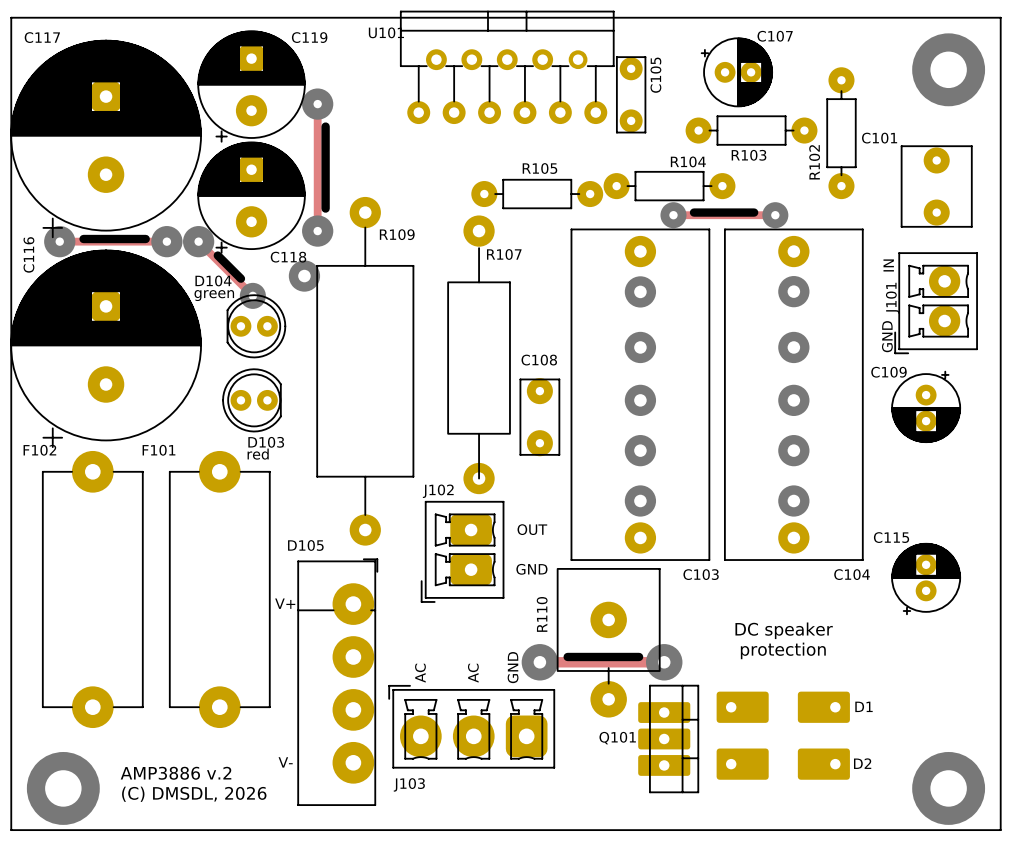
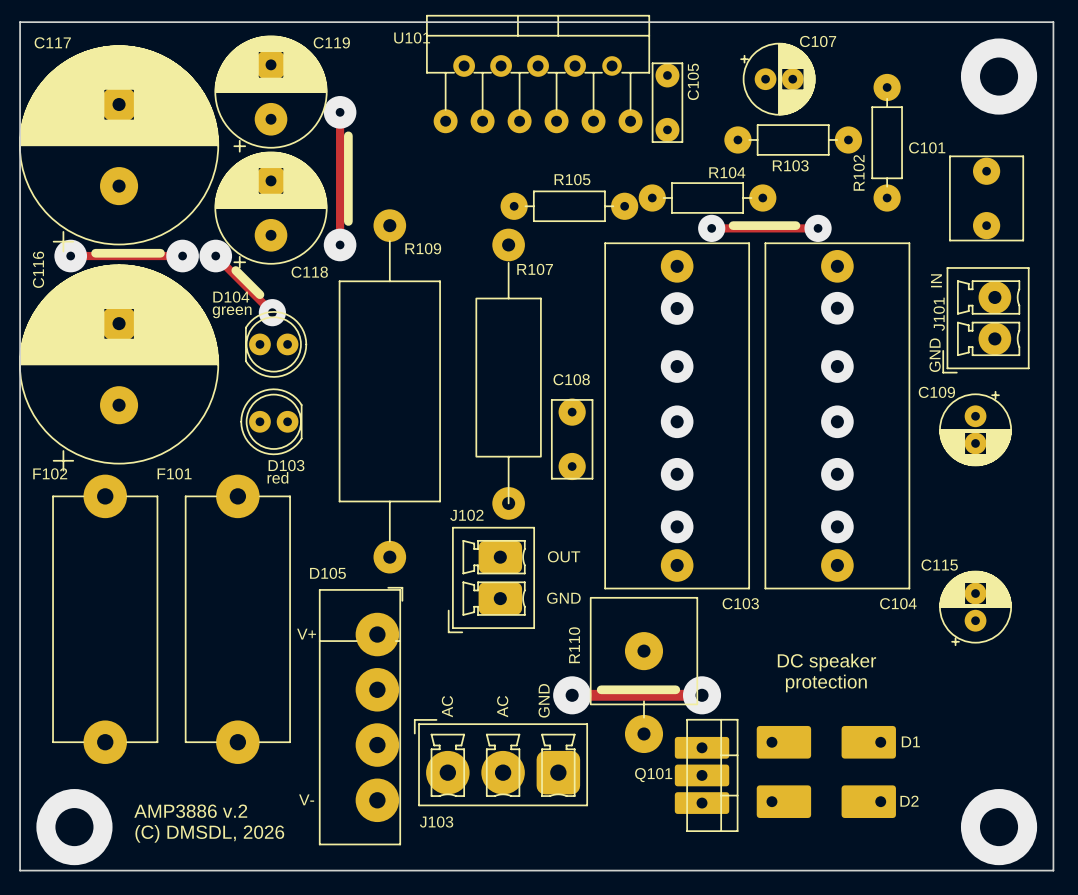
via: (304, 276) -> none

